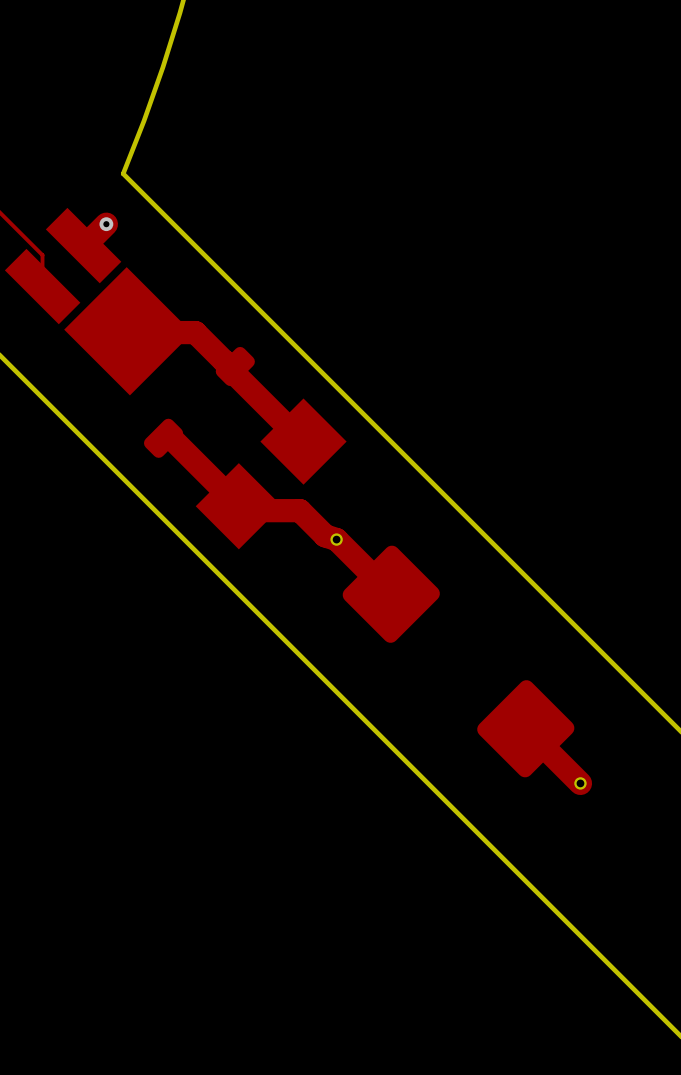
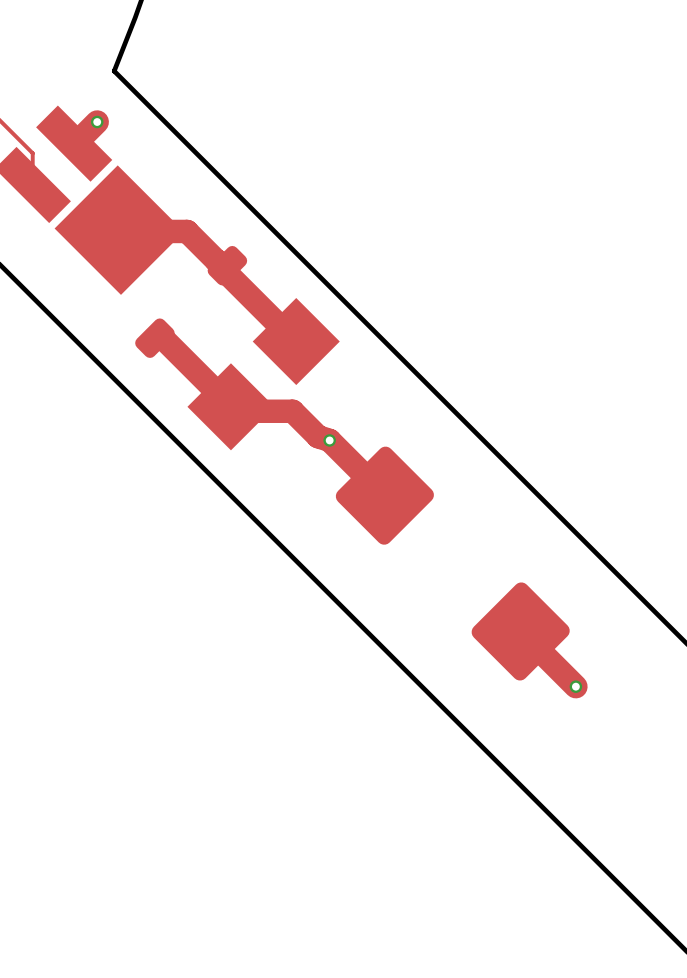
via: (106, 224) -> none
part: none -> (97, 122)

